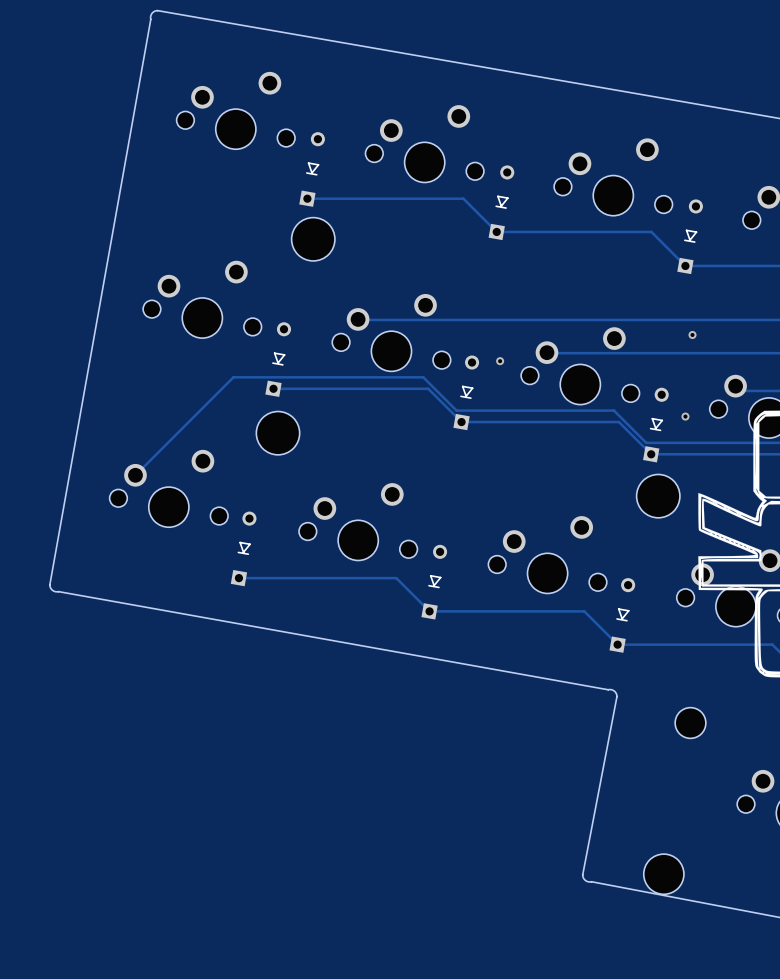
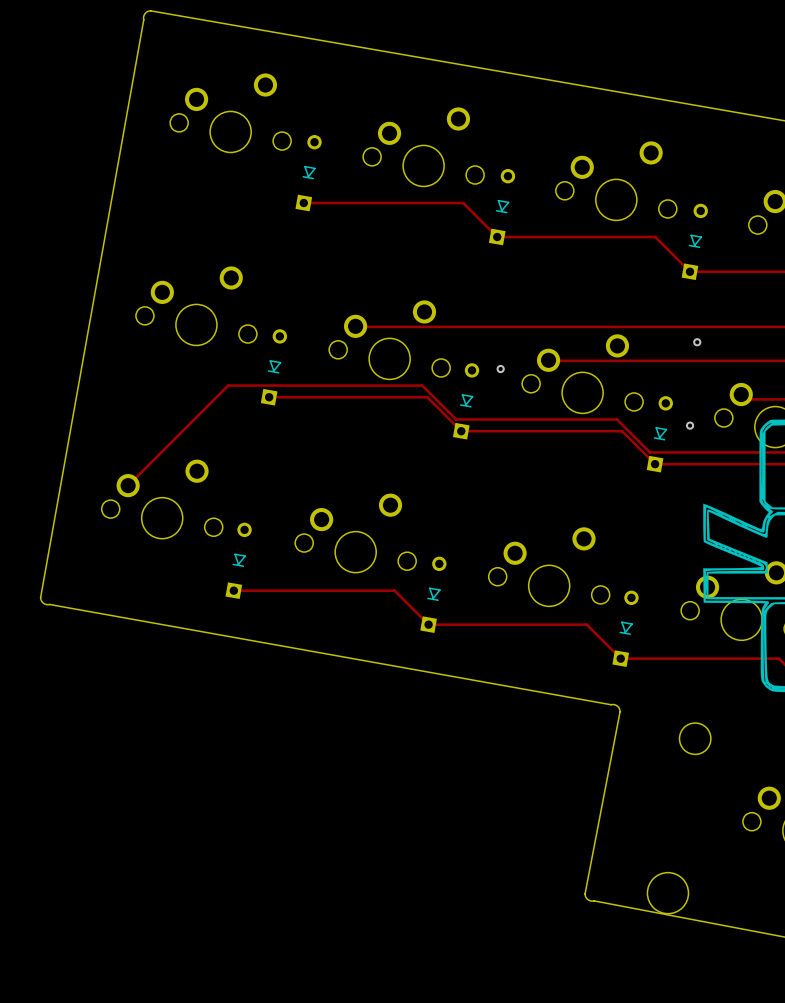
part: (313, 239) -> none
part: (278, 433) -> none
part: (658, 496) -> none

